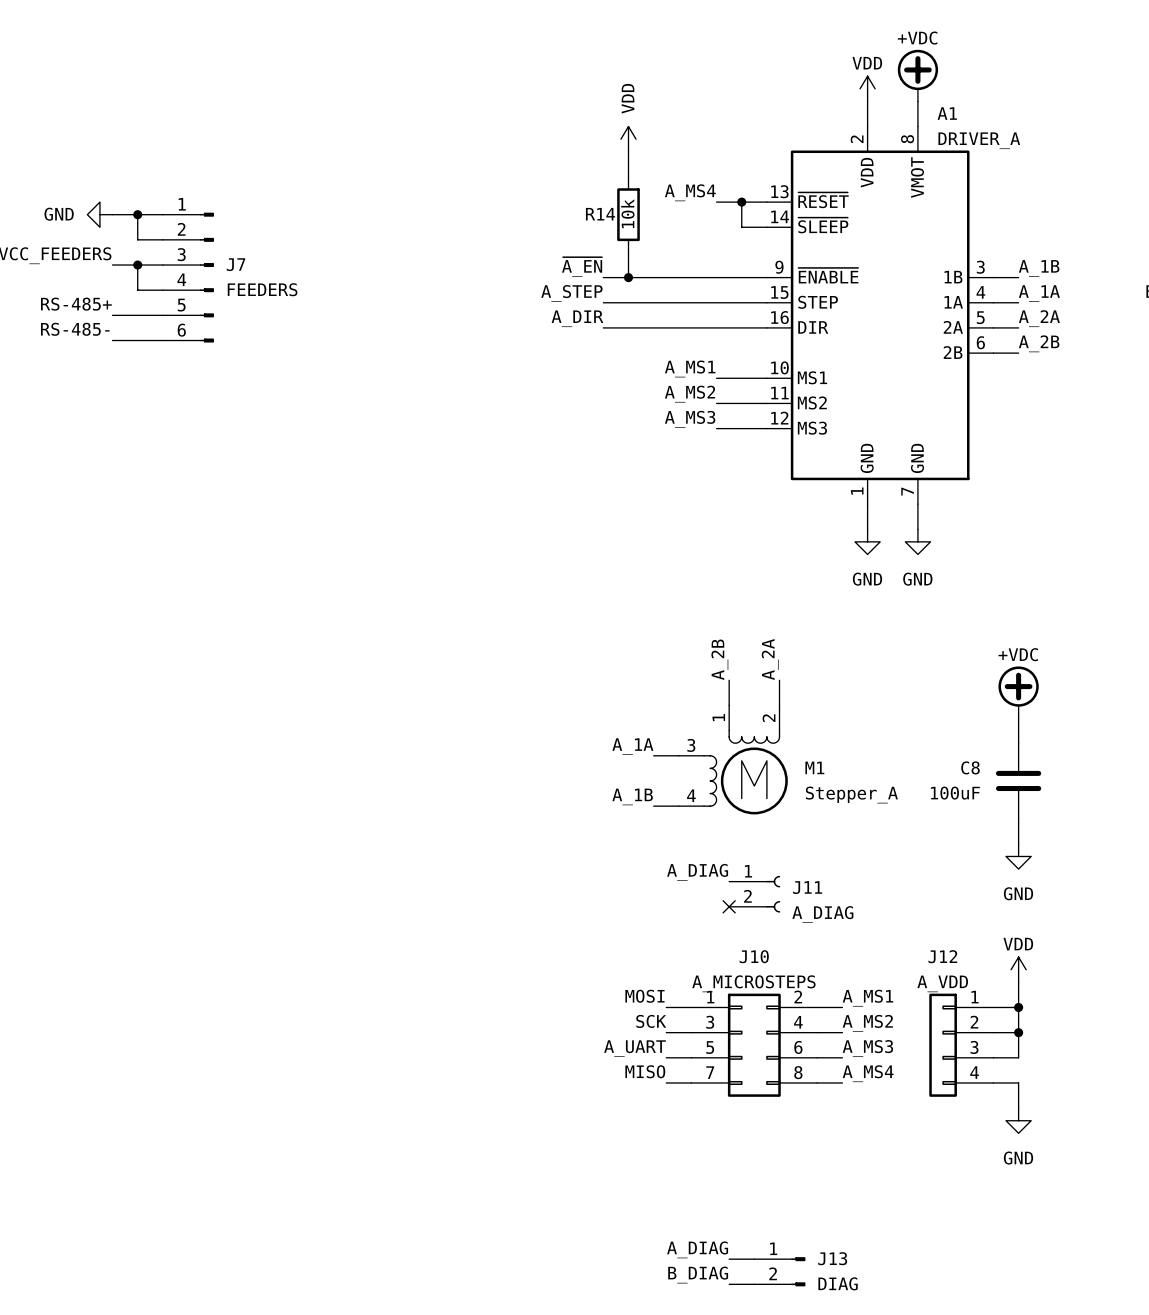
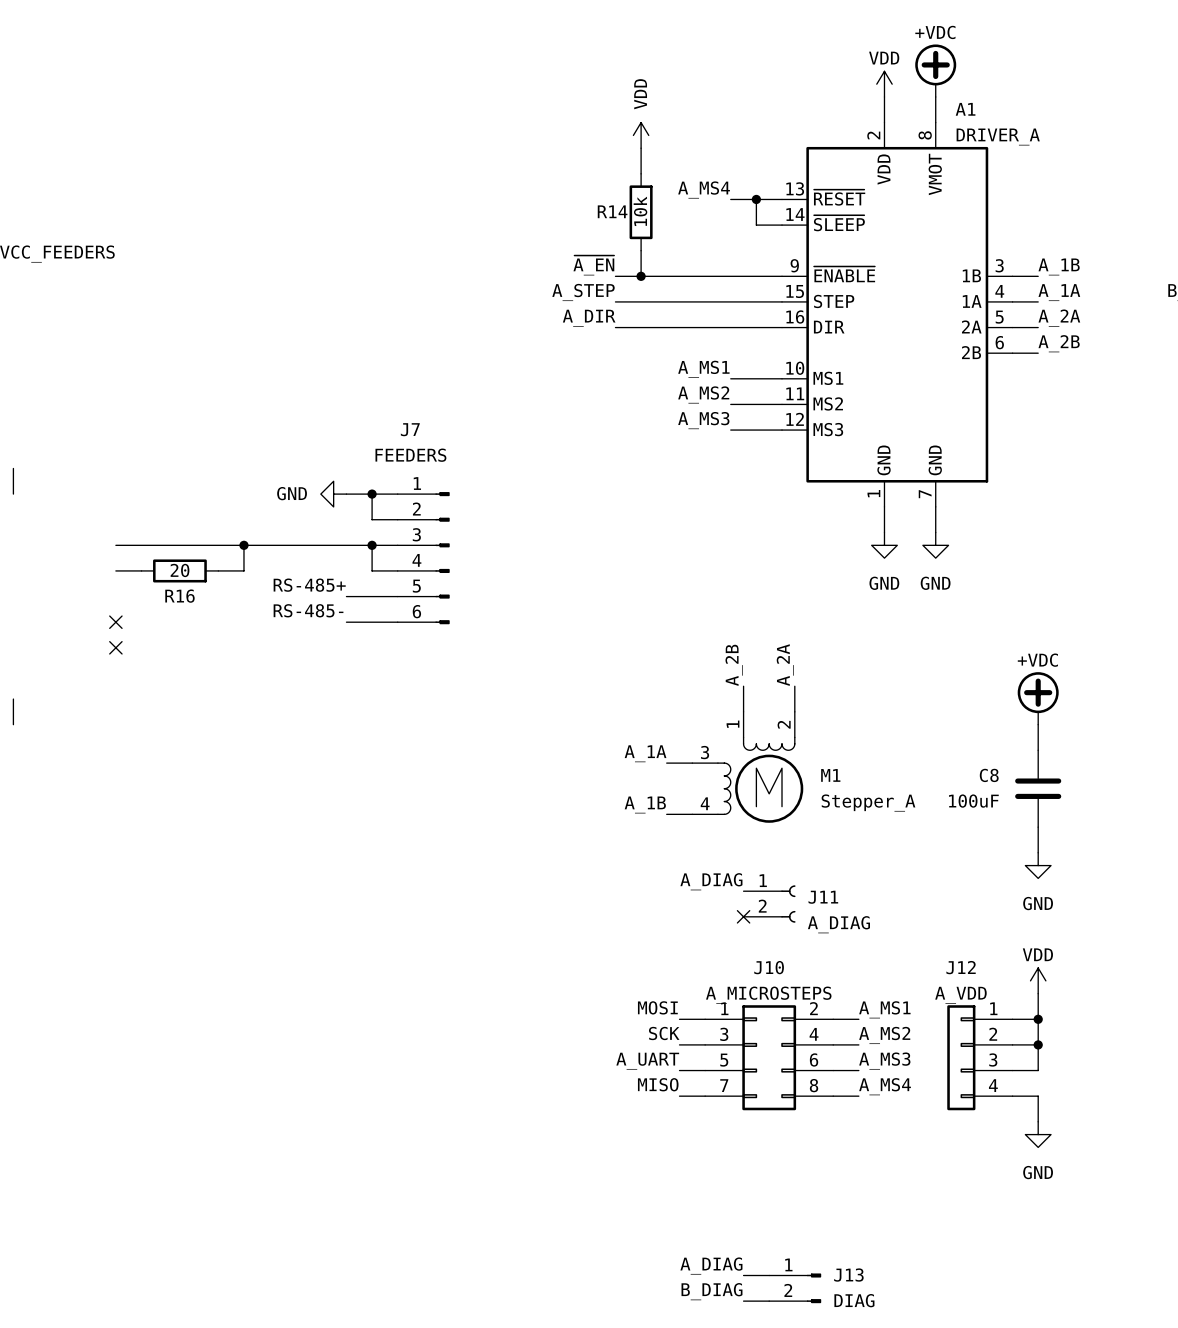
power symbol: GND (99, 214) -> none
wire: (112, 214) (162, 214) -> none
wire: (137, 214) (137, 239) (162, 239) -> none
junction: (137, 214) -> none
J7 name position: J7 (236, 264) -> J7 (410, 429)
wire: (112, 265) (162, 265) -> none
wire: (137, 265) (137, 290) (162, 290) -> none
junction: (137, 265) -> none
J7 position: (188, 277) -> (423, 558)
J7 value position: FEEDERS (262, 289) -> FEEDERS (410, 455)
label: RS-485+ (76, 304) -> none
wire: (112, 315) (162, 315) -> none
label: RS-485- (75, 329) -> none
wire: (112, 340) (162, 340) -> none
wire: none -> (13, 468) (13, 494)
power symbol: none -> GND (333, 494)
wire: none -> (346, 494) (397, 494)
wire: none -> (372, 494) (372, 519) (397, 519)
junction: none -> (372, 494)
wire: none -> (115, 545) (397, 545)
wire: none -> (243, 545) (243, 570) (218, 570)
junction: none -> (243, 545)
wire: none -> (372, 545) (372, 570) (397, 570)
junction: none -> (372, 545)
wire: none -> (115, 570) (141, 570)
R16: none -> 20 (179, 570)
label: none -> RS-485+ (309, 585)
wire: none -> (346, 596) (397, 596)
label: none -> RS-485- (308, 610)
no-connect mark: none -> (115, 622)
wire: none -> (346, 622) (397, 622)
no-connect mark: none -> (115, 647)
wire: none -> (13, 699) (13, 724)

